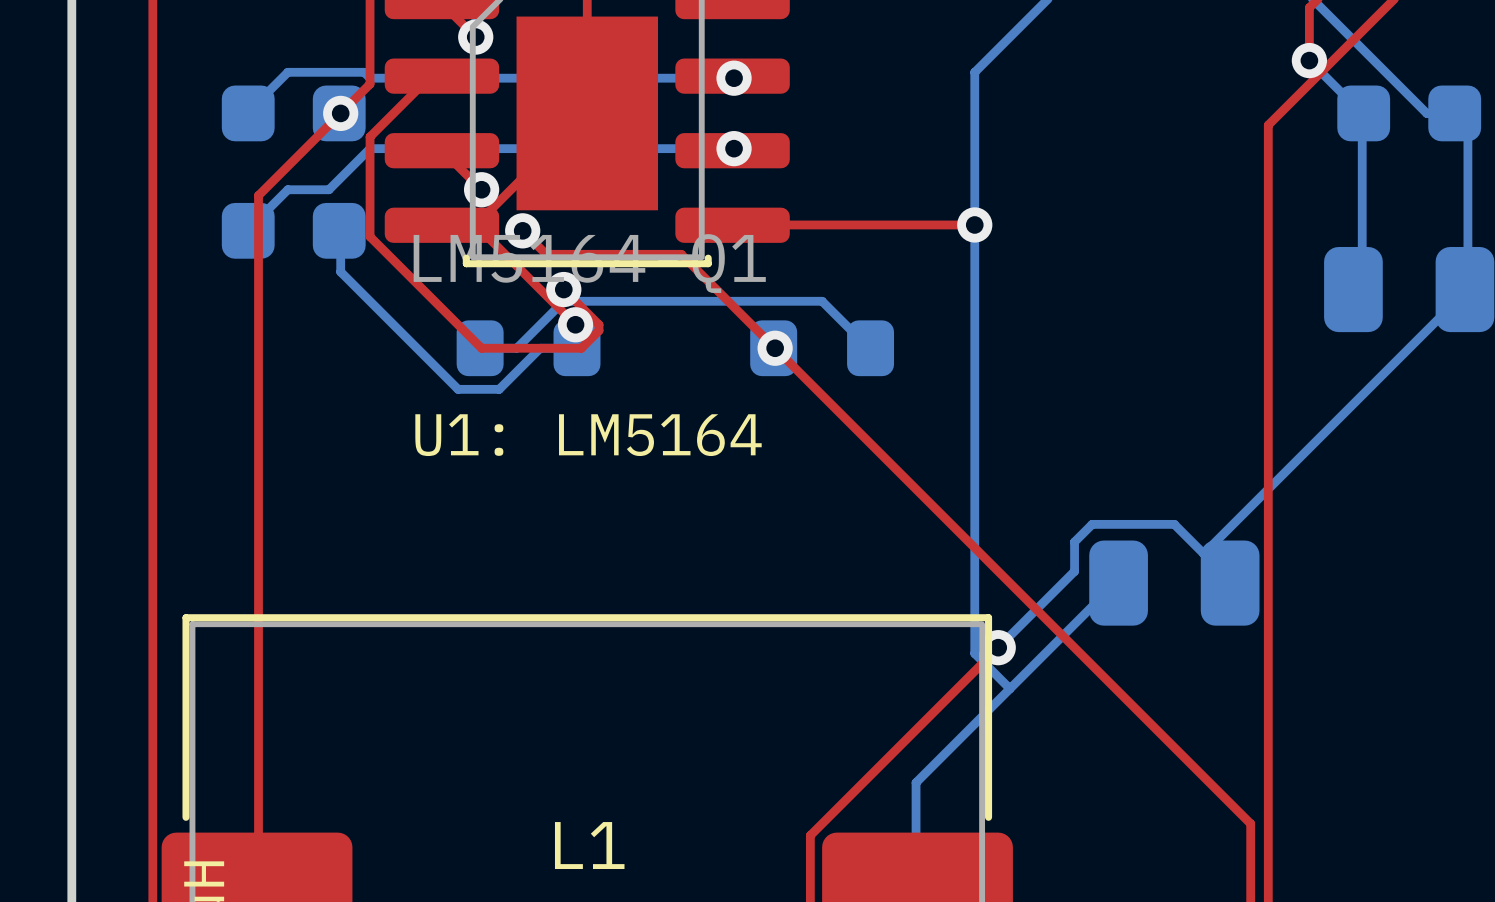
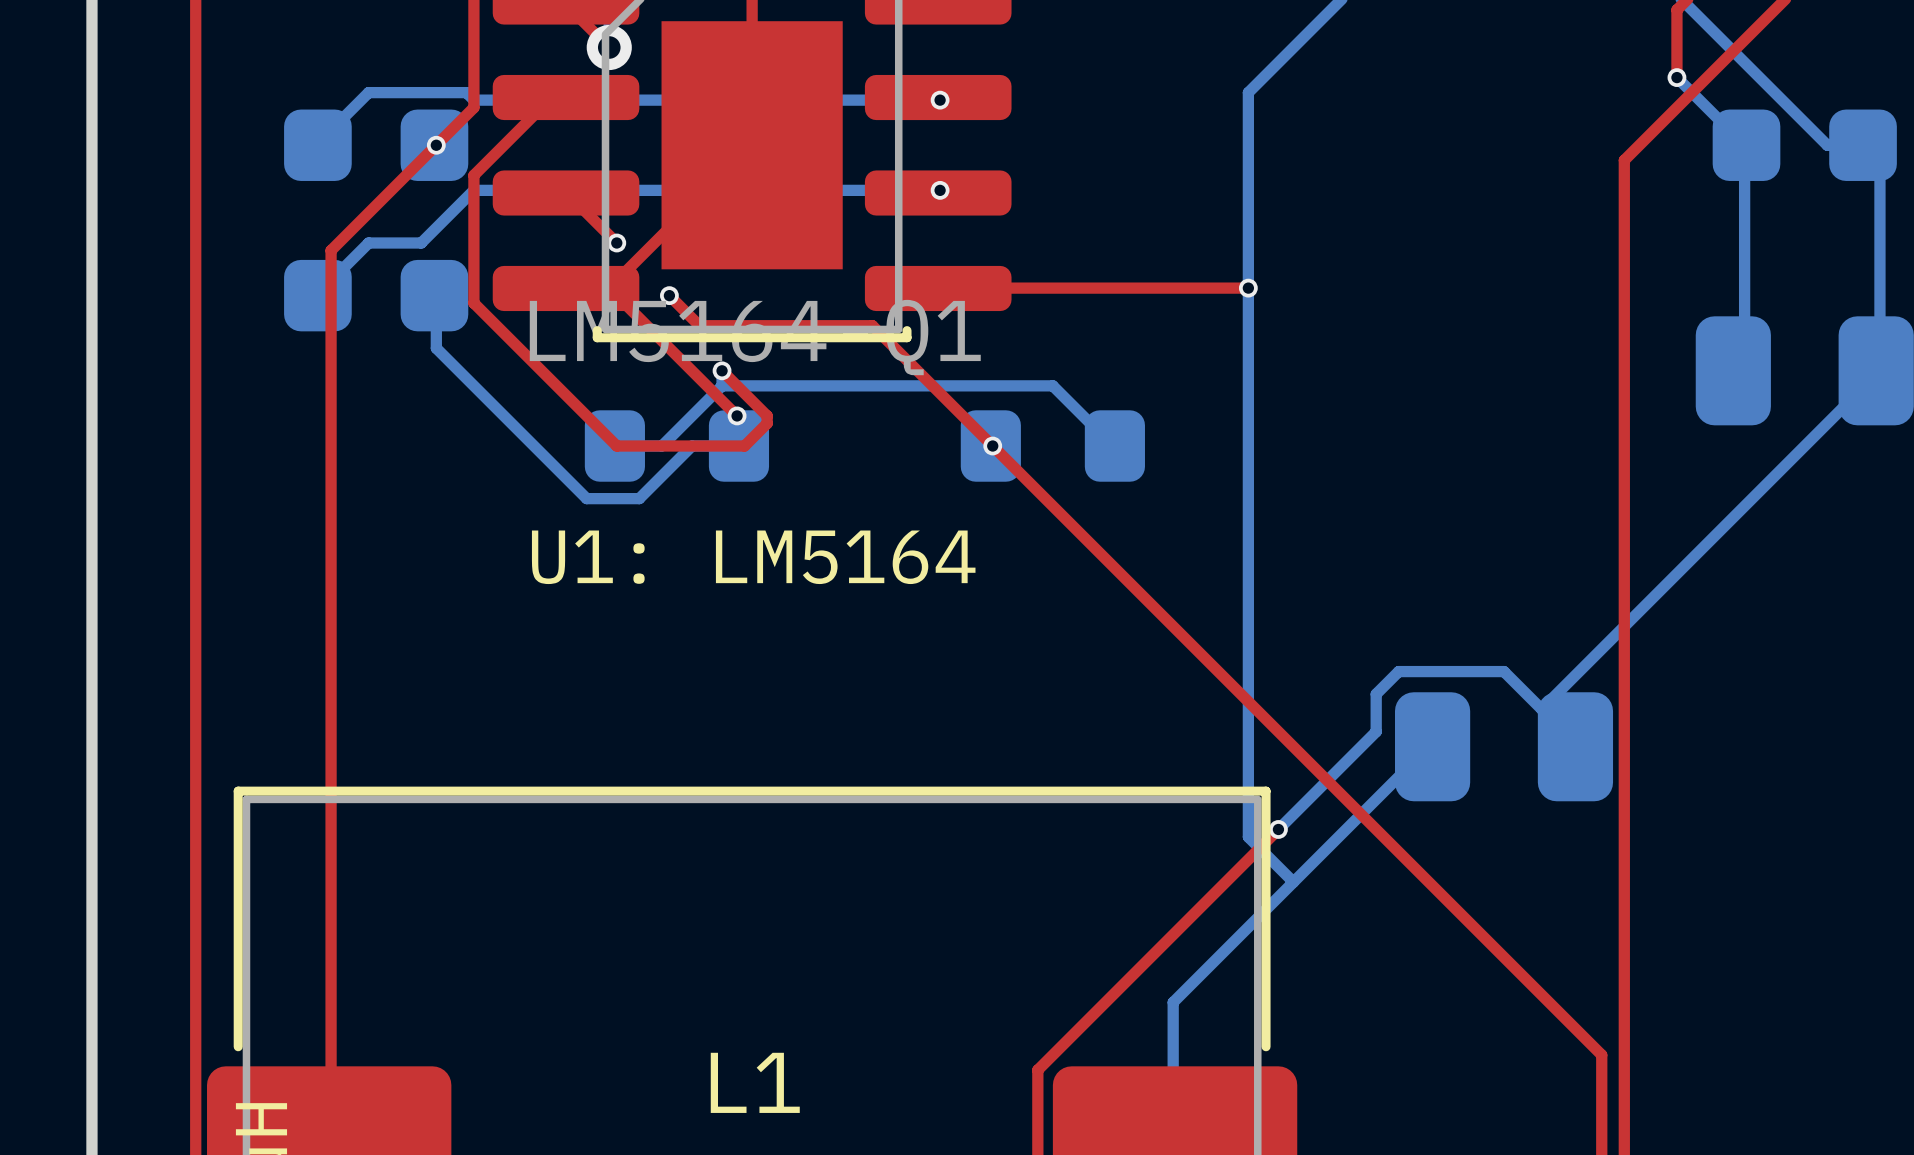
via size: [1291, 42, 1328, 79] -> [1667, 68, 1687, 87]
via size: [716, 60, 752, 96] -> [930, 90, 950, 110]
via size: [323, 95, 359, 132] -> [426, 135, 446, 155]
via size: [716, 131, 752, 167] -> [930, 180, 950, 200]
via size: [463, 172, 500, 208] -> [607, 233, 627, 253]
via size: [957, 207, 993, 243] -> [1238, 278, 1258, 298]
via size: [505, 213, 541, 249] -> [660, 286, 679, 306]
via size: [546, 271, 582, 308] -> [712, 361, 732, 381]
via size: [557, 307, 594, 343] -> [727, 406, 747, 426]
via size: [757, 330, 793, 366] -> [983, 436, 1003, 456]
via size: [980, 630, 1016, 666] -> [1269, 820, 1288, 839]

